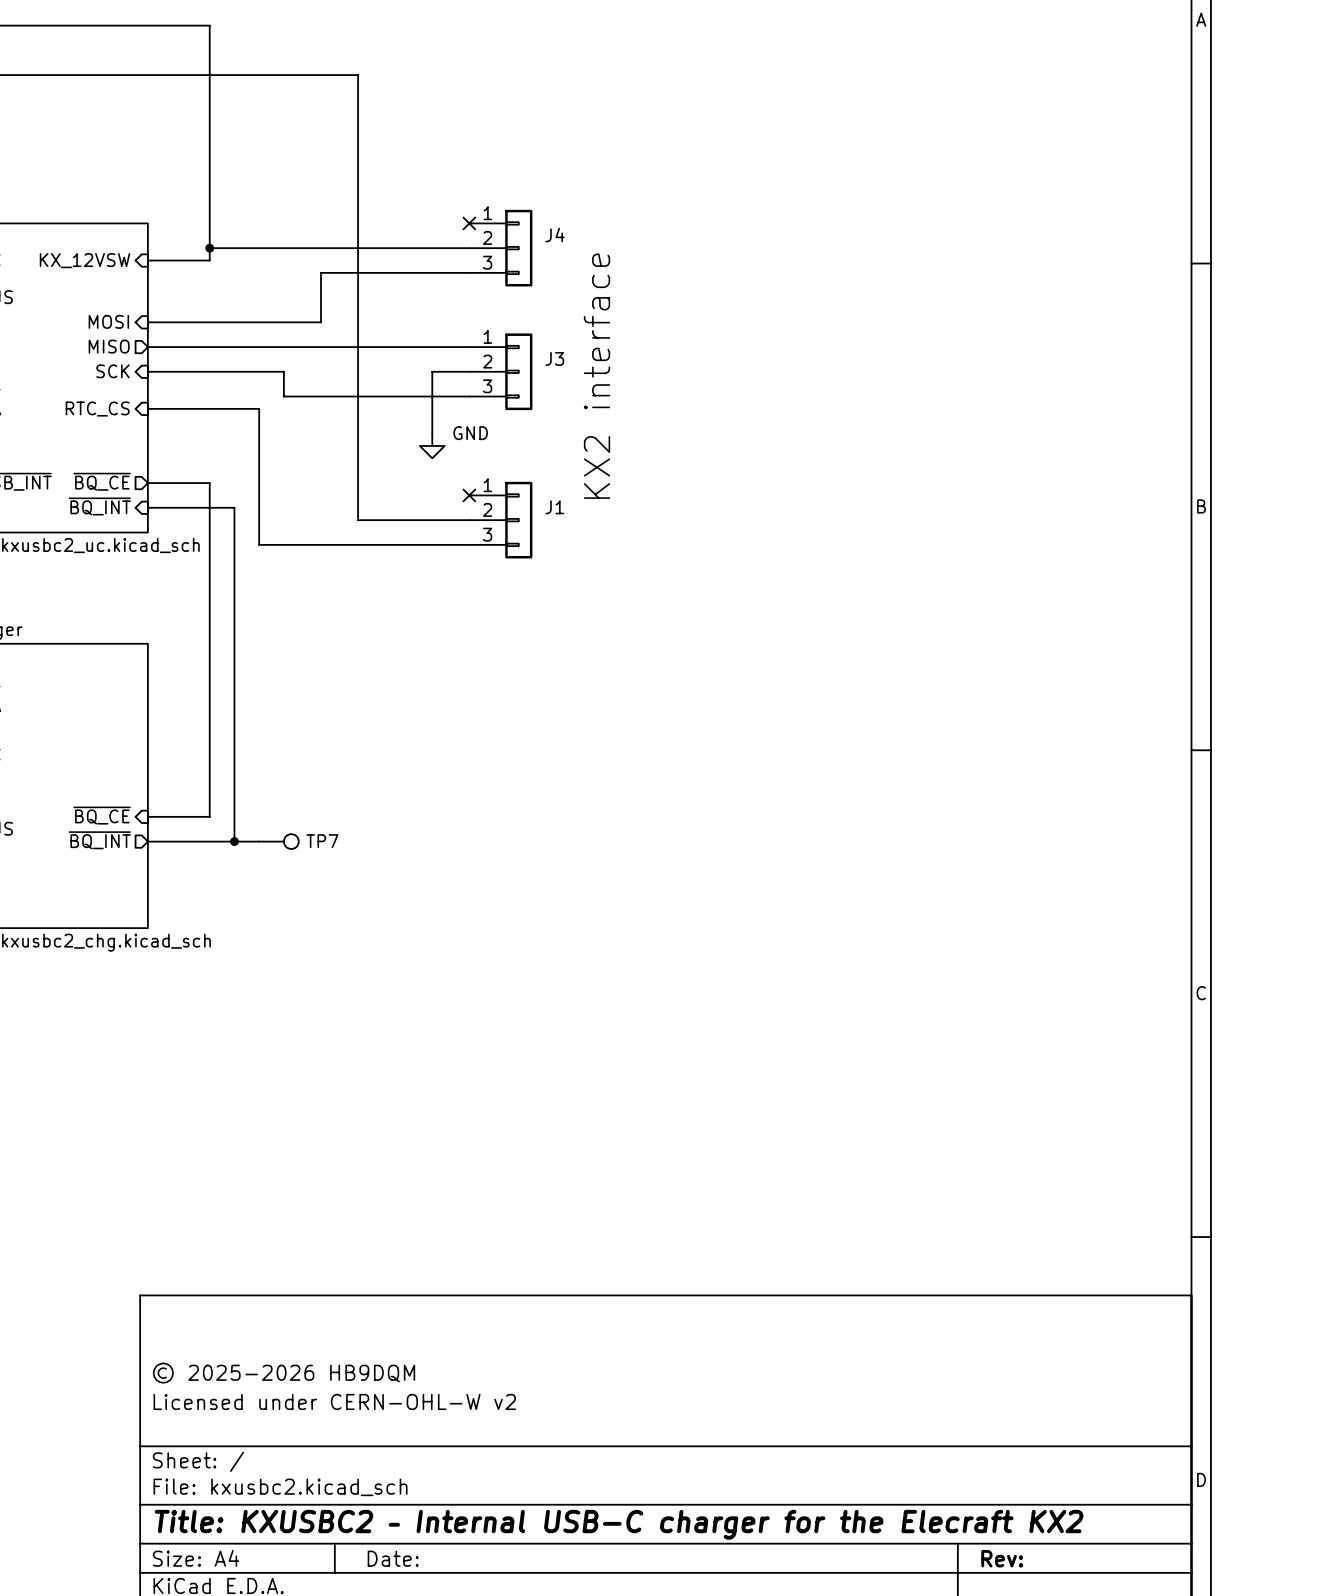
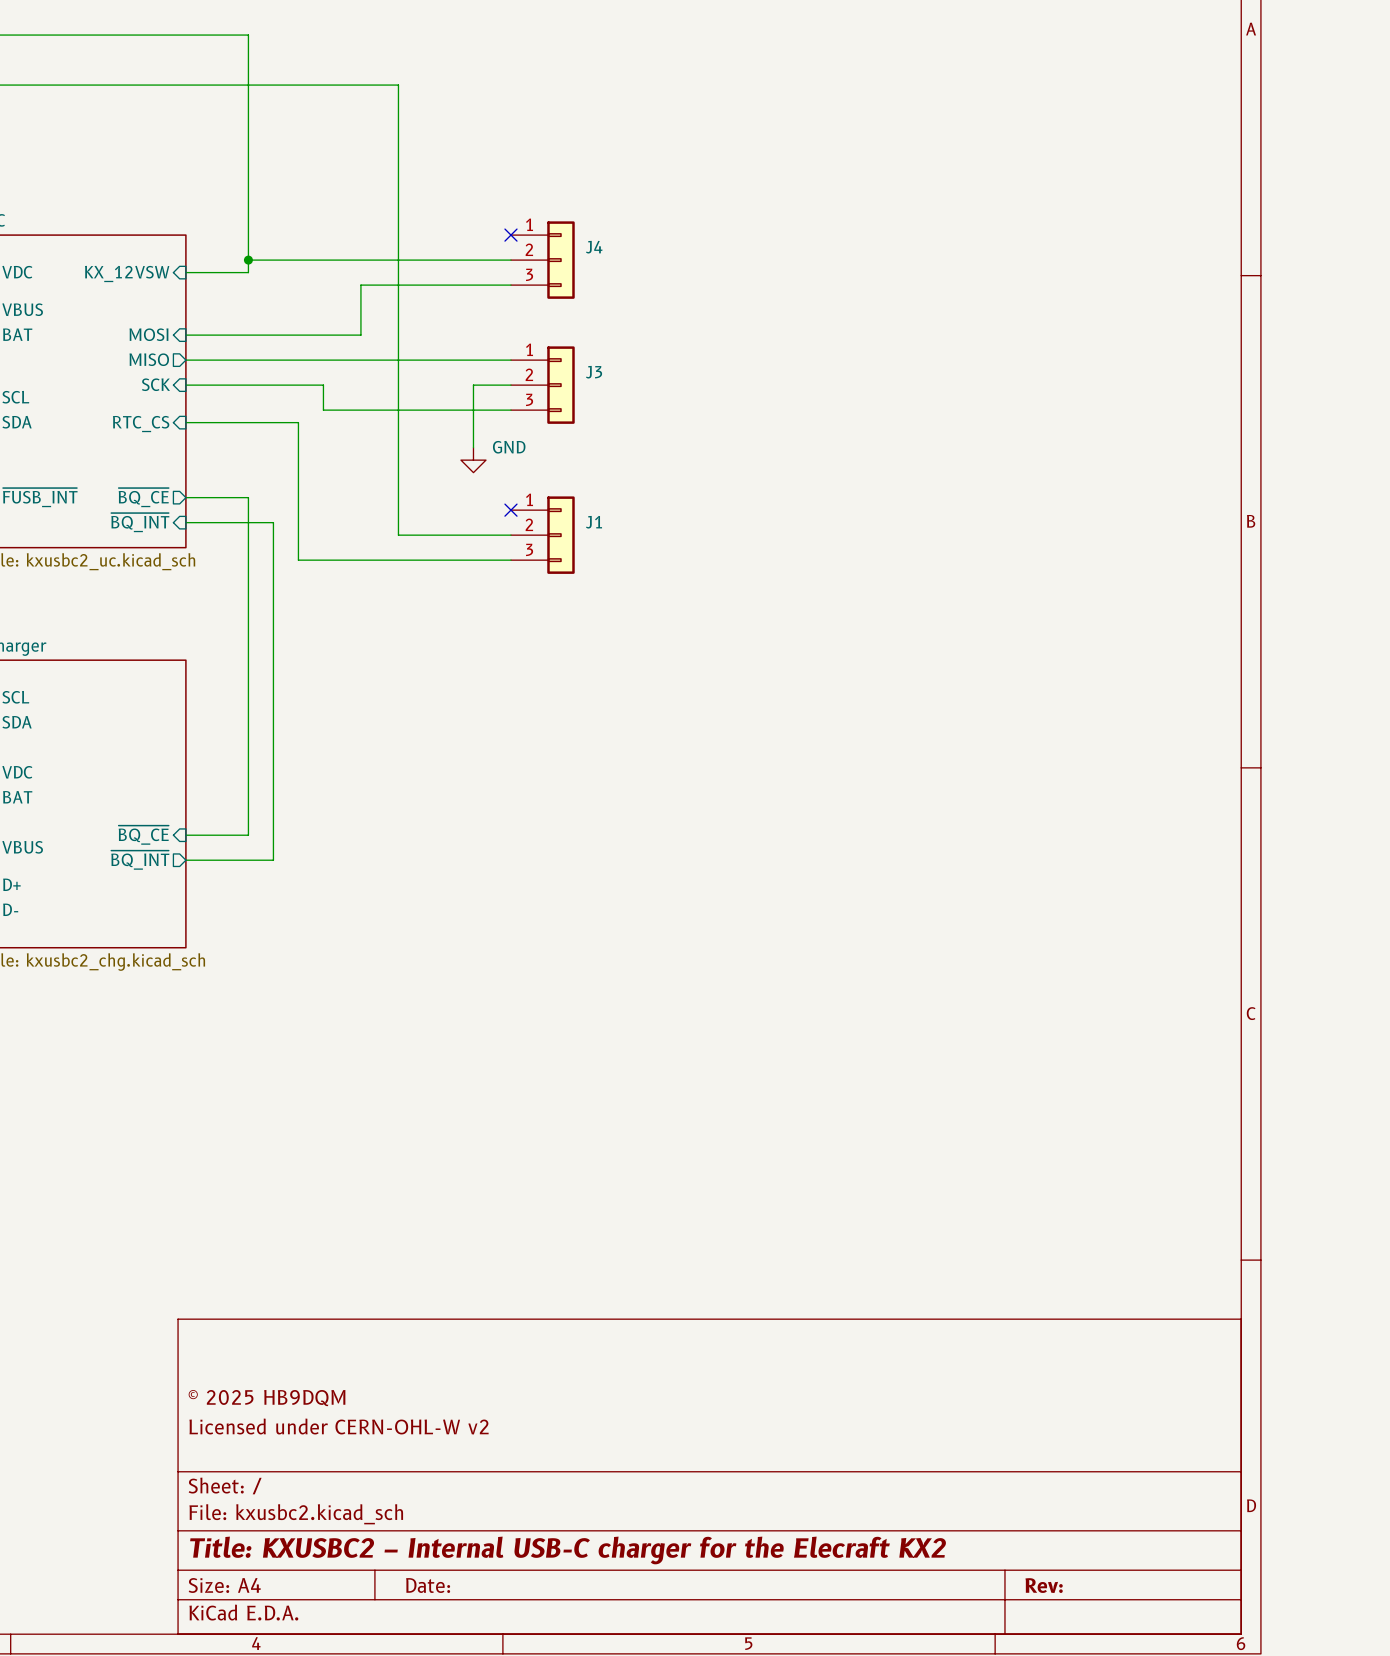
text: KX2 interface (597, 376) -> none
wire: (234, 841) (259, 841) -> none
junction: (234, 841) -> none
TP7: (278, 841) -> none
title block: © 2025-2026 HB9DQM (284, 1373) -> © 2025 HB9DQM (267, 1398)

